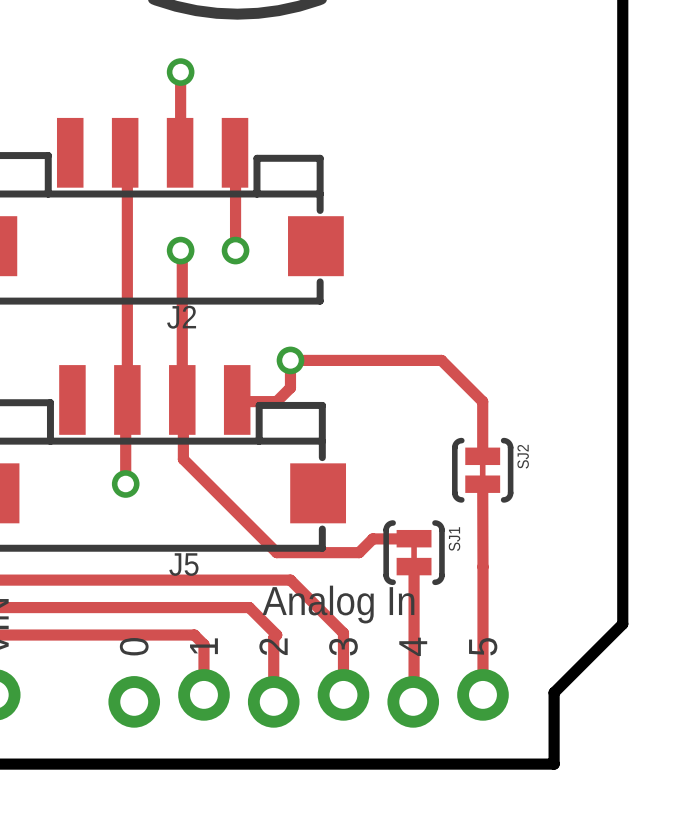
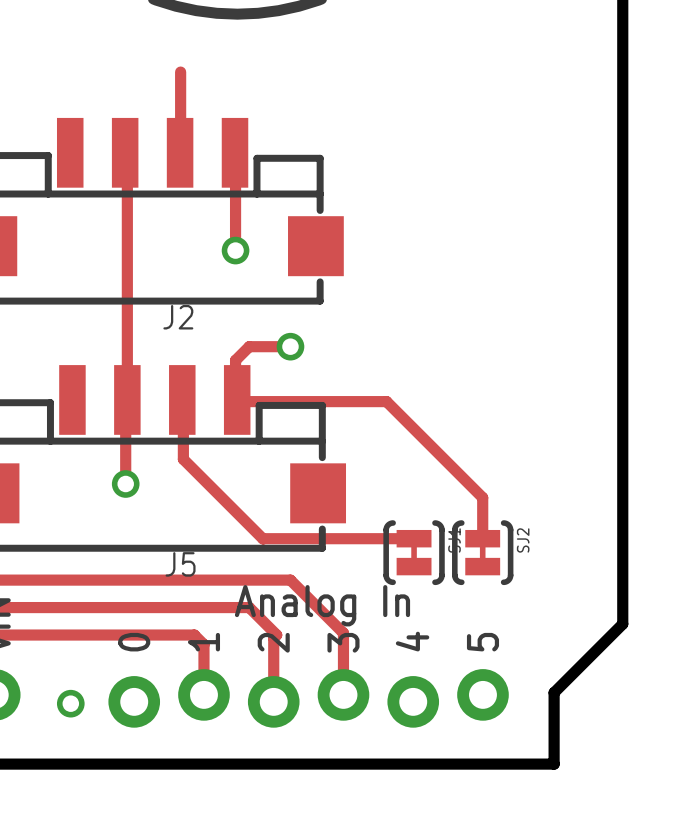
via: (180, 72) -> none
track: (180, 250) (182, 252) (182, 399) -> none
via: (180, 250) -> none
track: none -> (290, 346) (249, 346) (235, 360) (235, 398)
via position: (290, 360) -> (290, 346)
track: (276, 401) (290, 387) (290, 360) (441, 360) (482, 401) (482, 456) -> (276, 401) (386, 401) (482, 497) (482, 538)
SJ2 position: (482, 470) -> (482, 552)
track: (482, 484) (482, 694) -> none
track: (263, 538) (276, 552) (359, 552) (372, 538) (413, 538) -> (263, 538) (414, 538)
track: (414, 566) (413, 701) -> none
via: none -> (70, 703)

